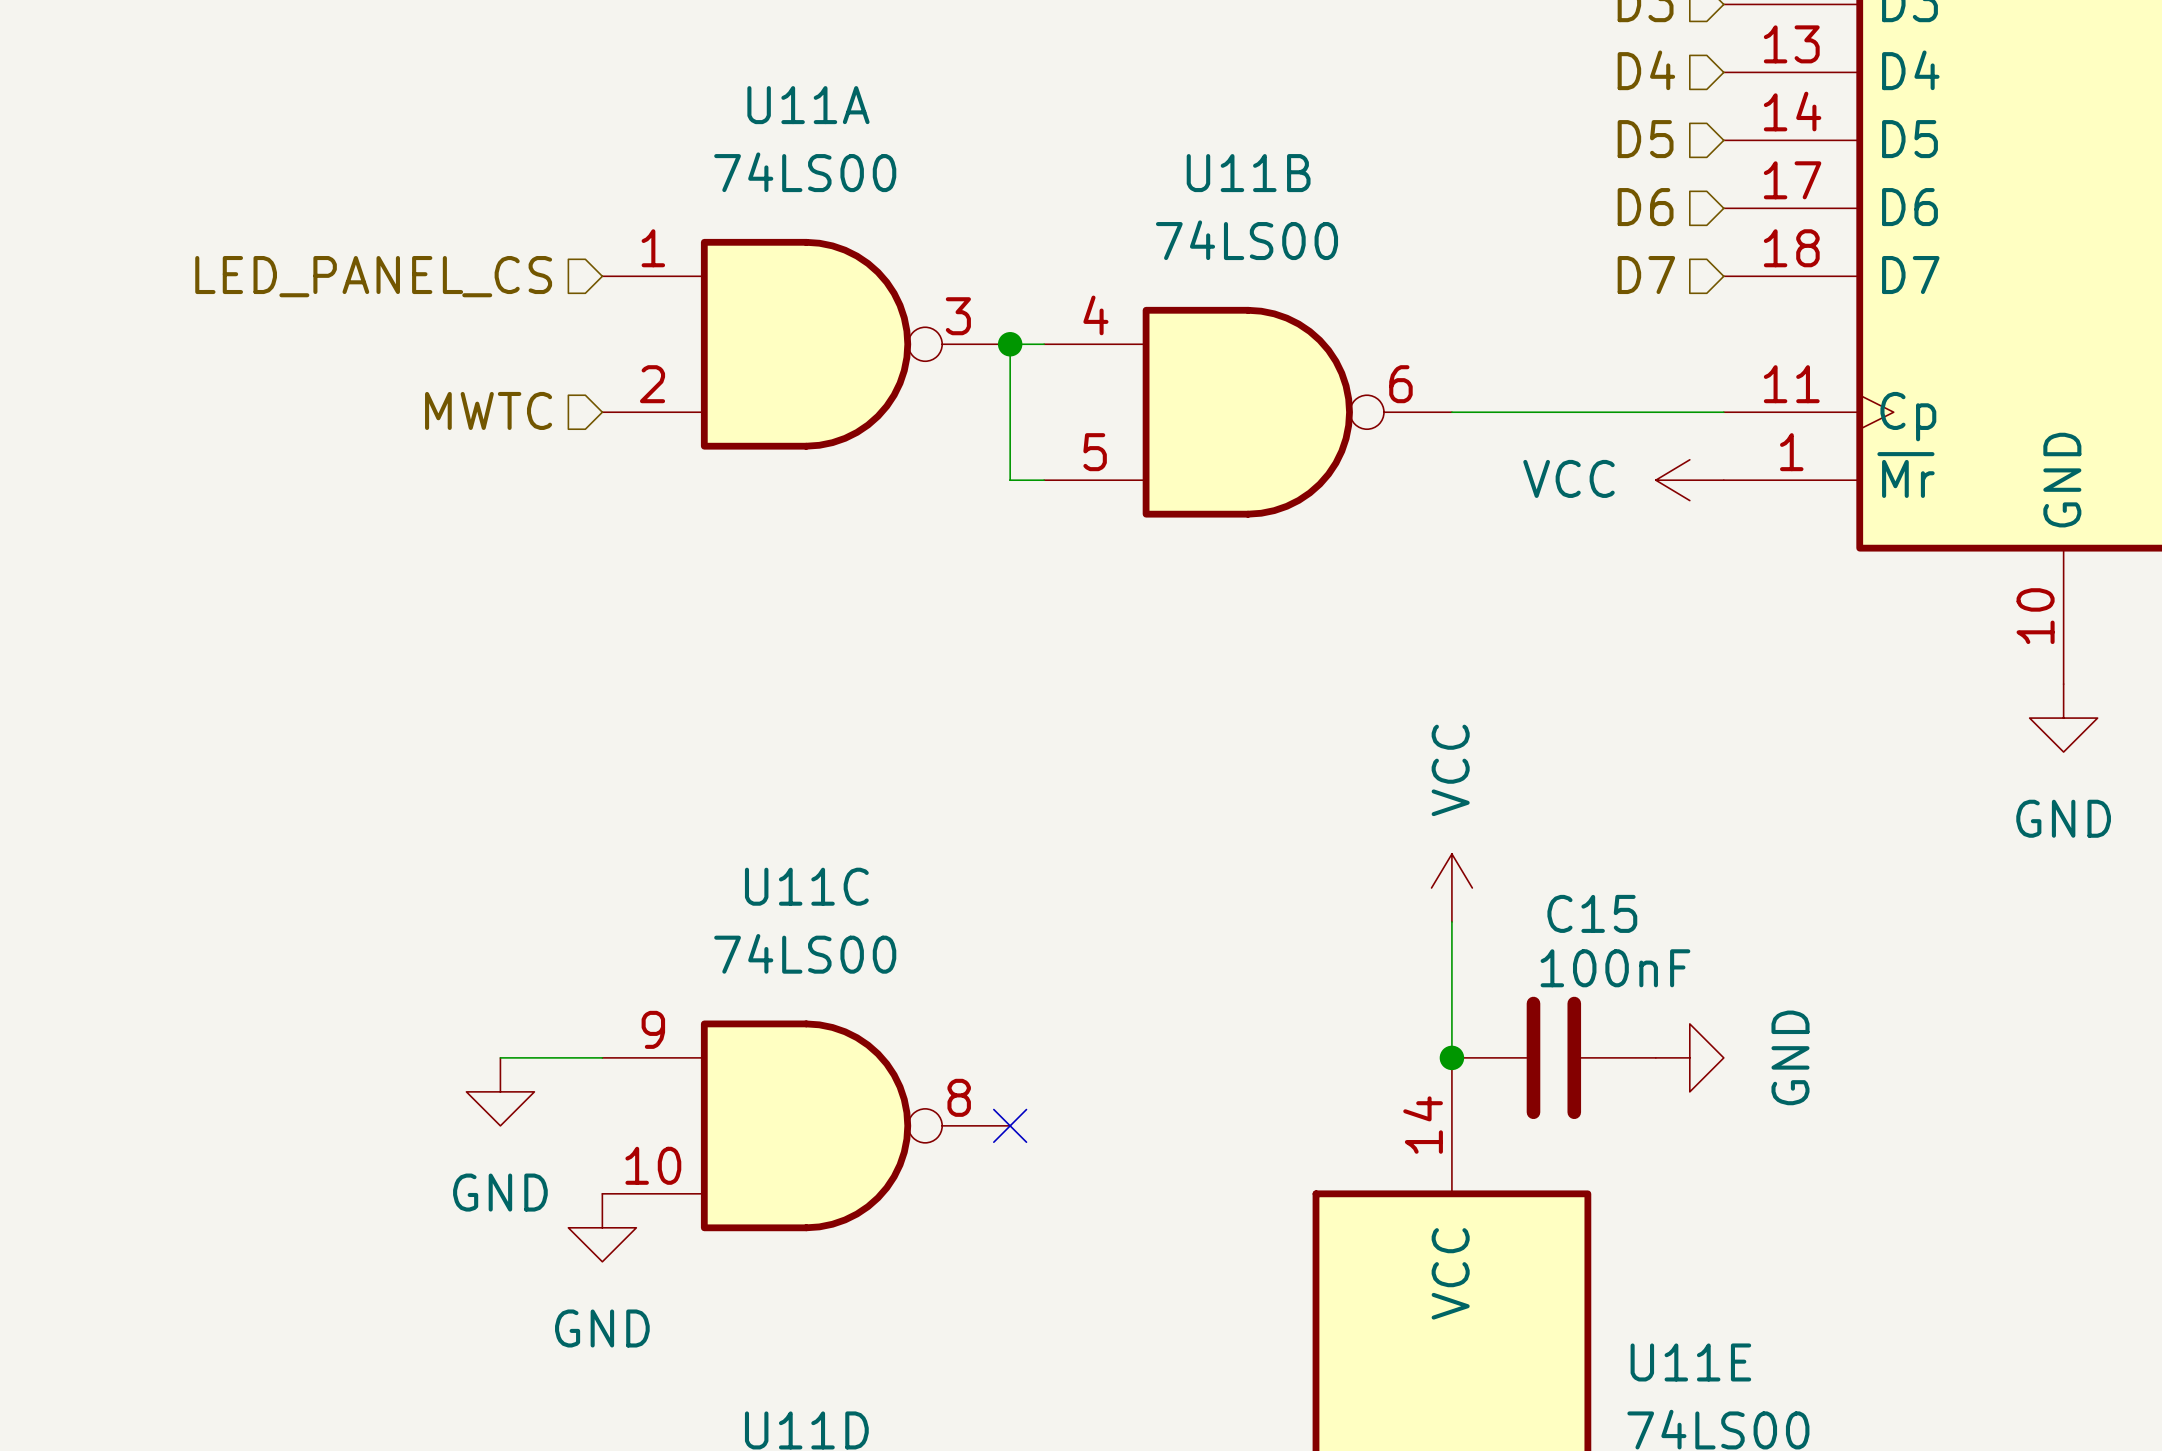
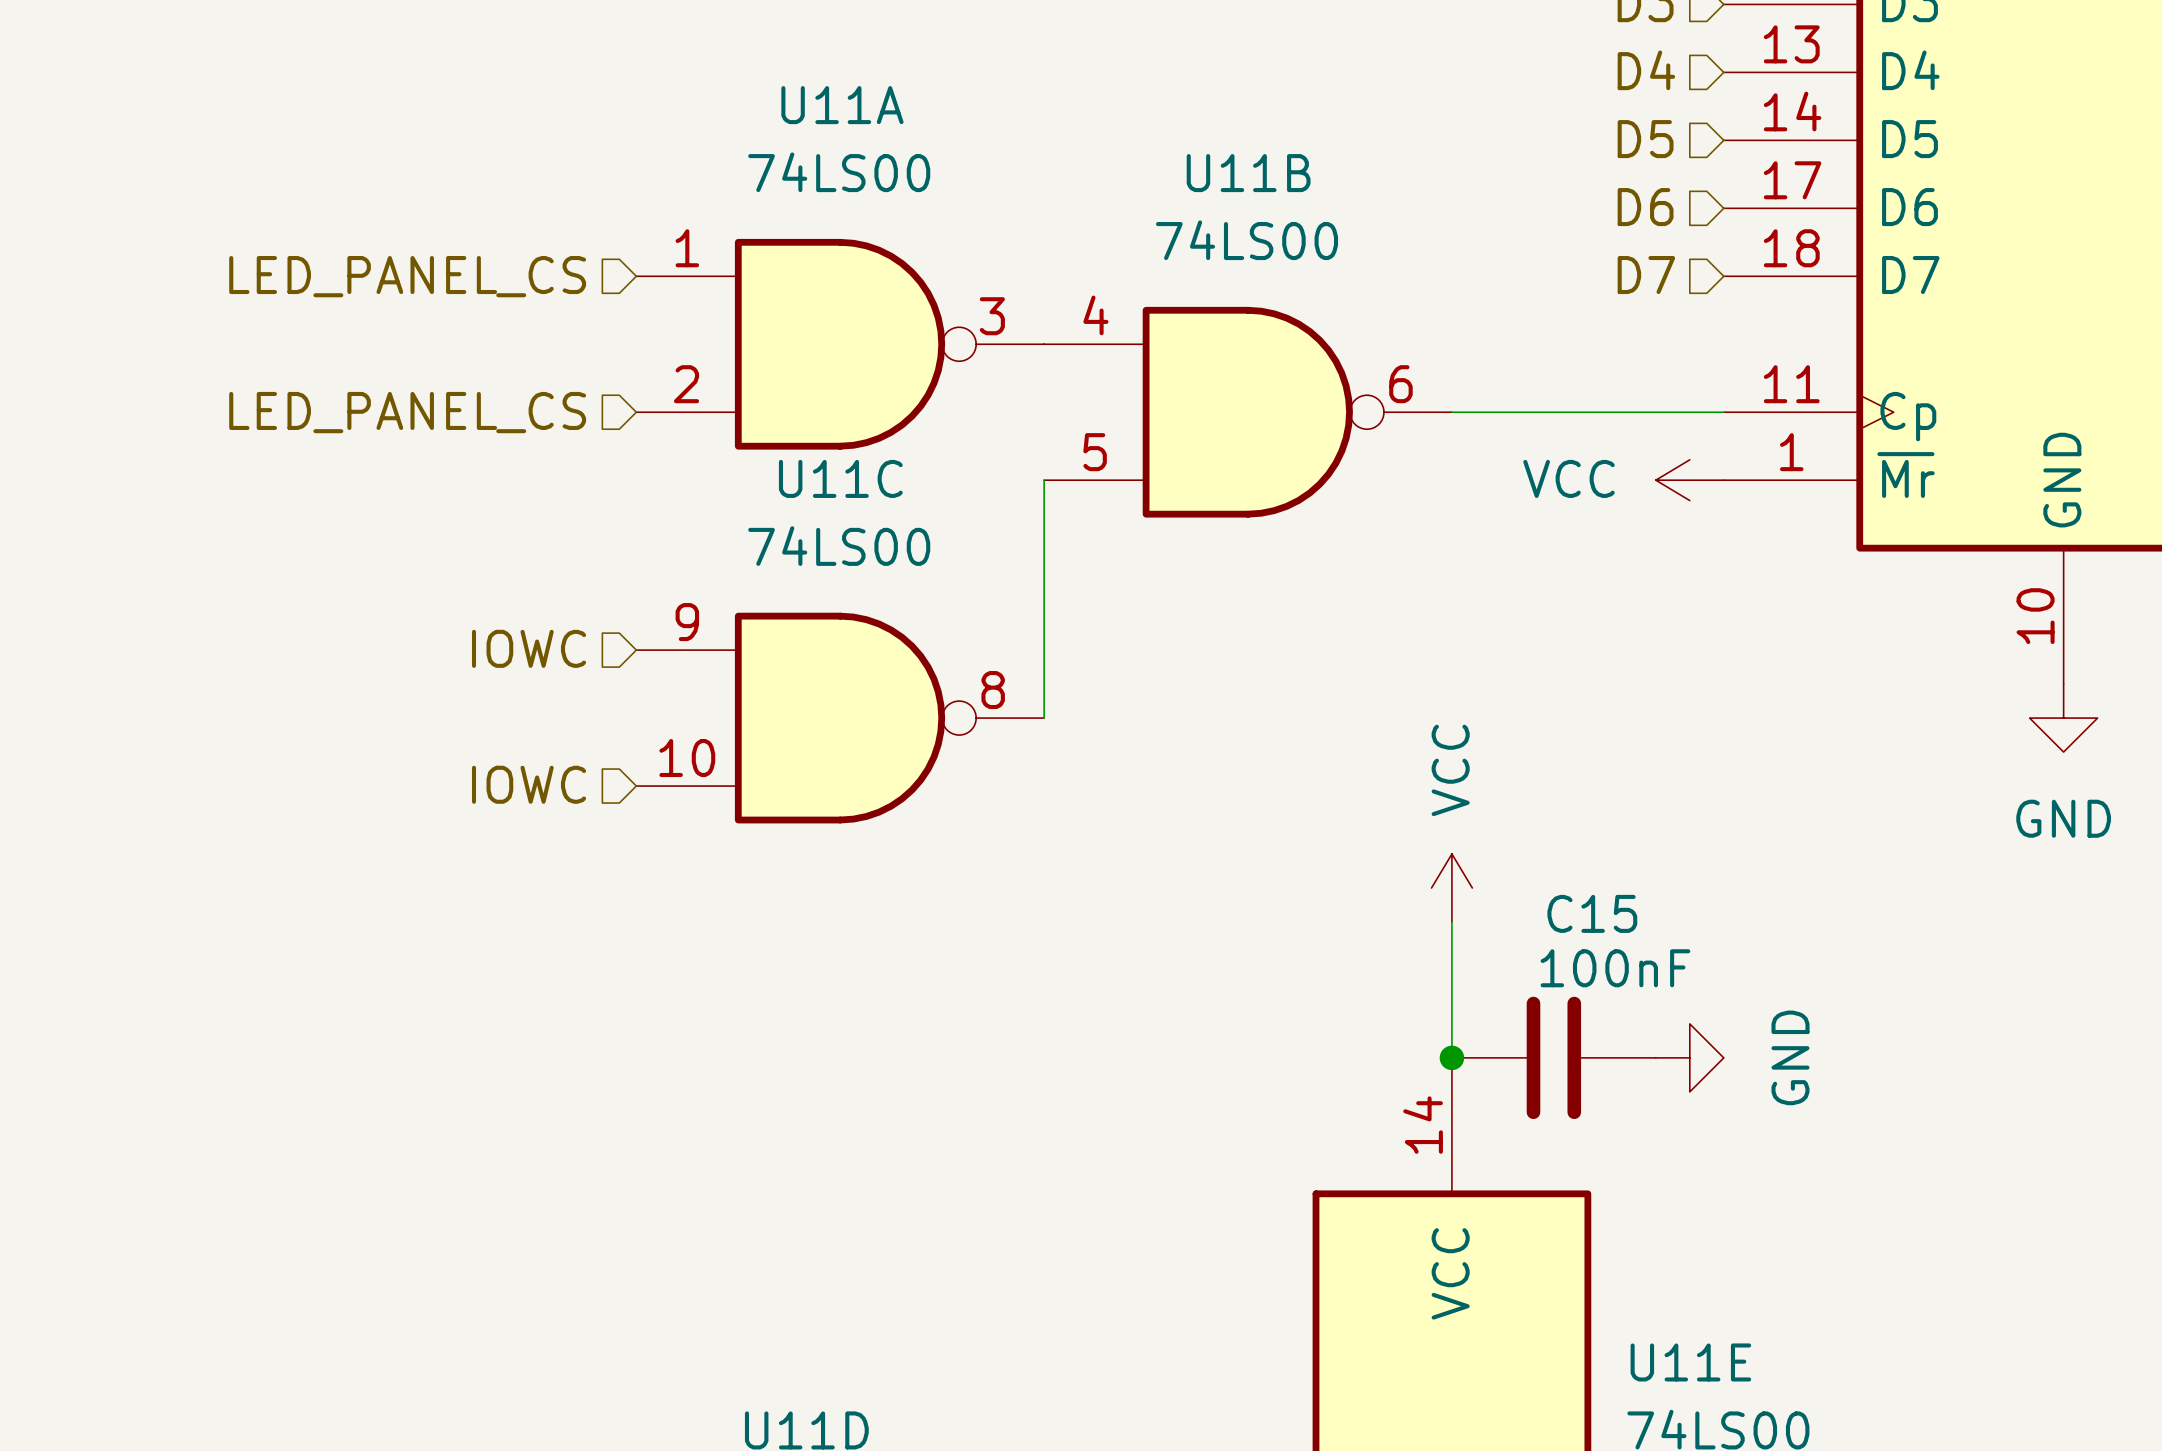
hierarchical label position: LED_PANEL_CS (373, 276) -> LED_PANEL_CS (407, 276)
U11A position: (806, 344) -> (840, 344)
junction: (1010, 344) -> none
wire: (1044, 344) (1010, 344) (1010, 480) (1044, 480) -> (1044, 718) (1044, 480)
hierarchical label: MWTC (488, 410) -> none
hierarchical label: none -> LED_PANEL_CS (407, 412)
hierarchical label: none -> IOWC (529, 648)
hierarchical label: none -> IOWC (529, 784)
wire: (500, 1057) (602, 1057) -> none
power symbol: GND (500, 1091) -> none
U11C position: (806, 1125) -> (840, 718)
no-connect mark: (1010, 1125) -> none
power symbol: GND (602, 1227) -> none

